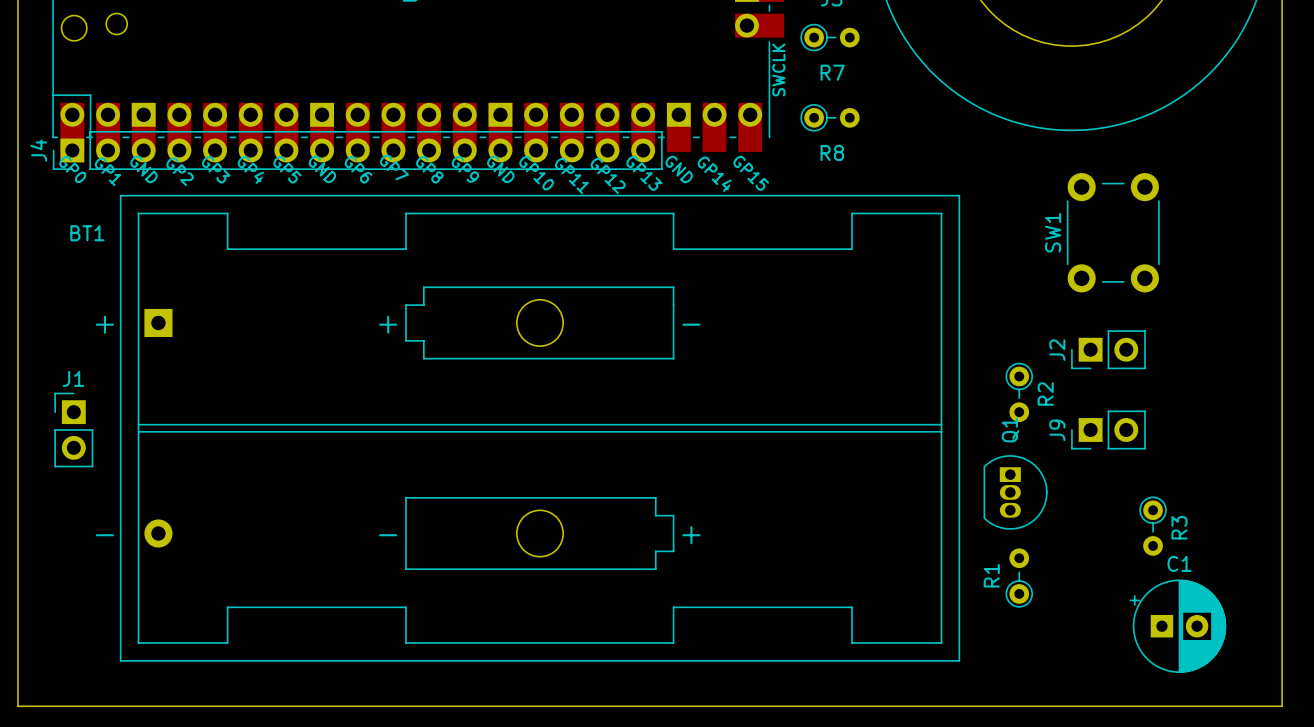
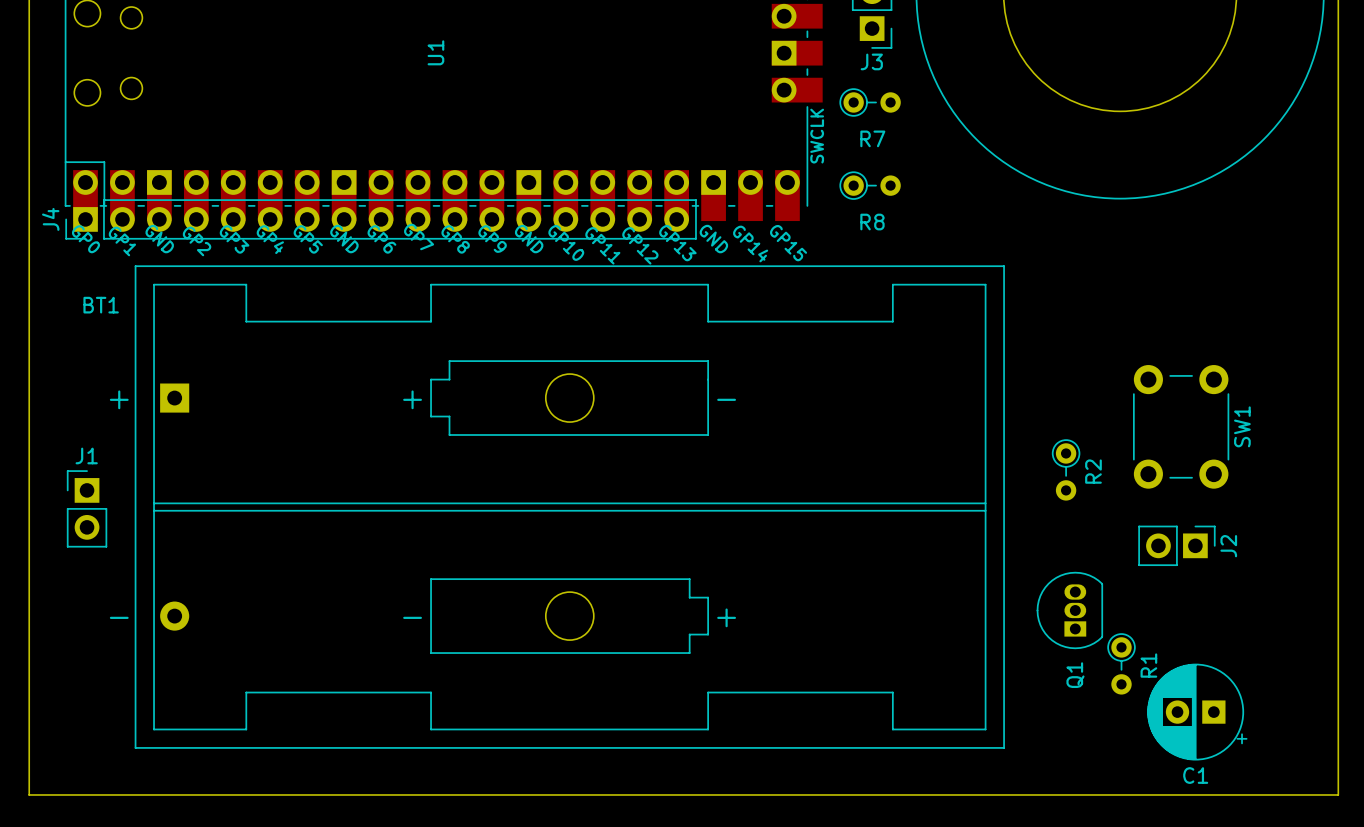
SW1 name position: SW1 (1053, 232) -> SW1 (1242, 426)
SW1 position: (1113, 232) -> (1181, 426)
J2 rotation: 0° (1108, 349) -> 180° (1176, 545)
J2 position: (1108, 349) -> (1176, 545)
J9: (1108, 430) -> none
Q1 rotation: 0° (1015, 492) -> 180° (1069, 610)
R3: (1153, 526) -> none
R1 rotation: 0° (1019, 578) -> 180° (1121, 663)
R1 position: (1019, 578) -> (1121, 663)
C1 rotation: 0° (1177, 626) -> 180° (1197, 712)

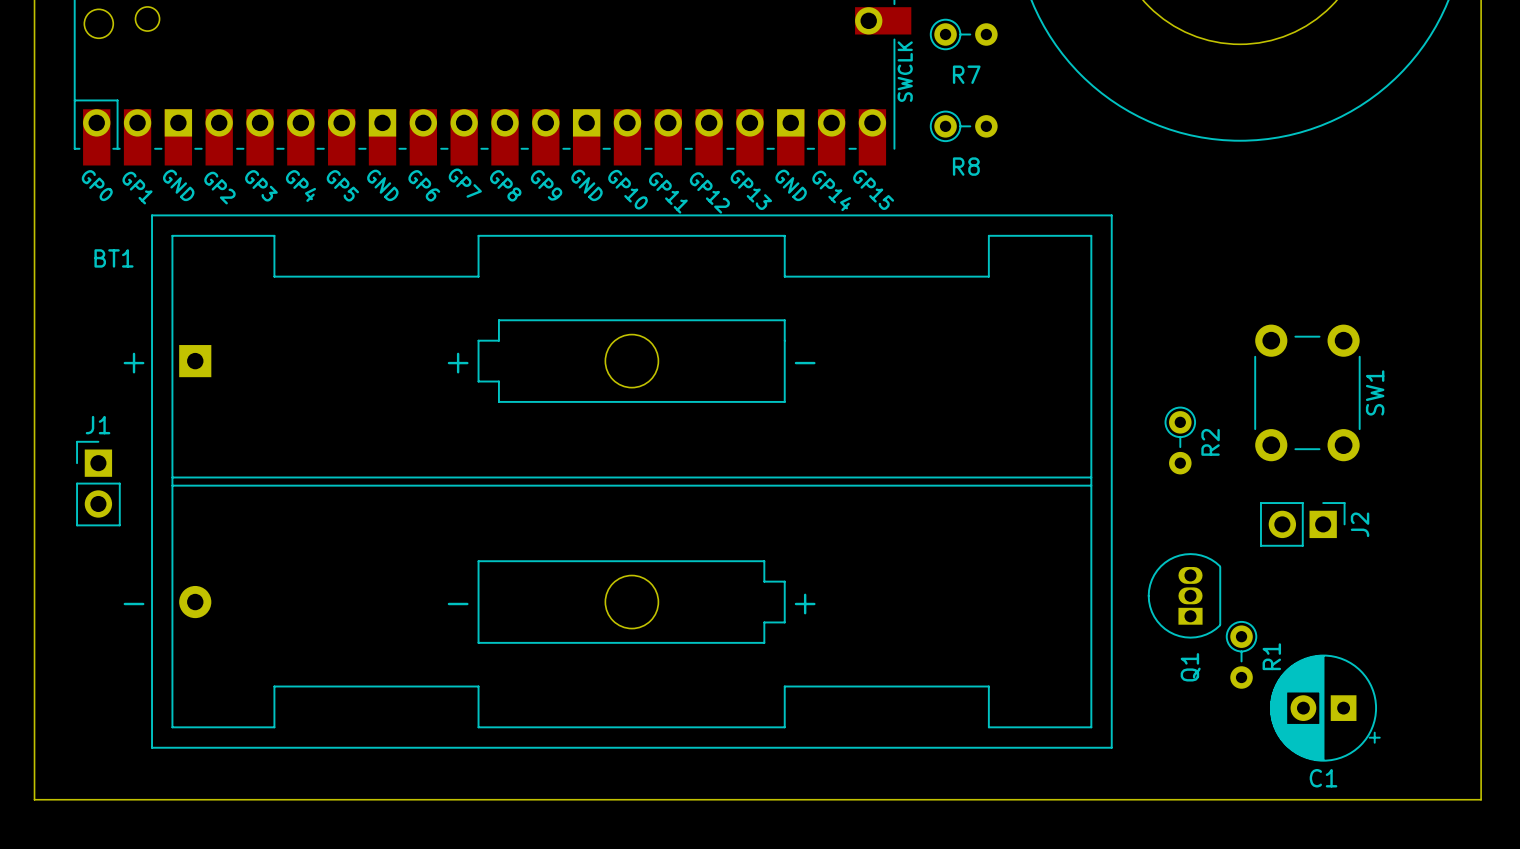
J4: (381, 219) -> none

